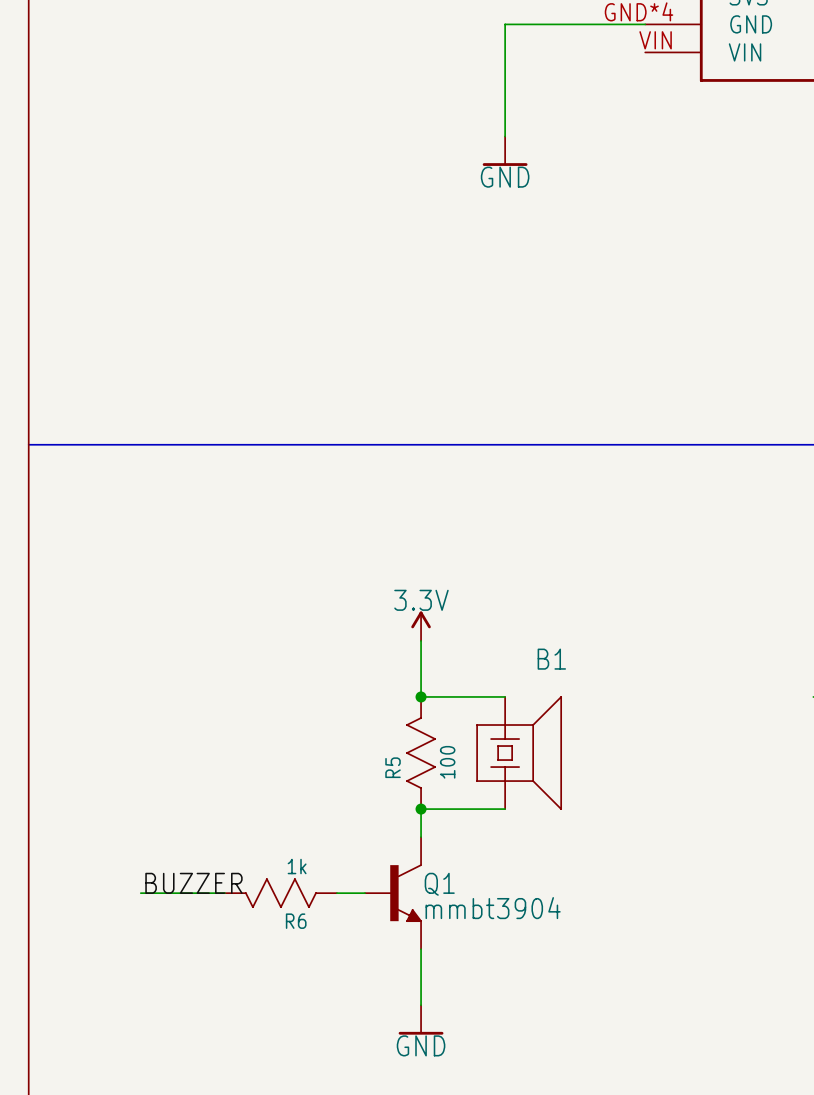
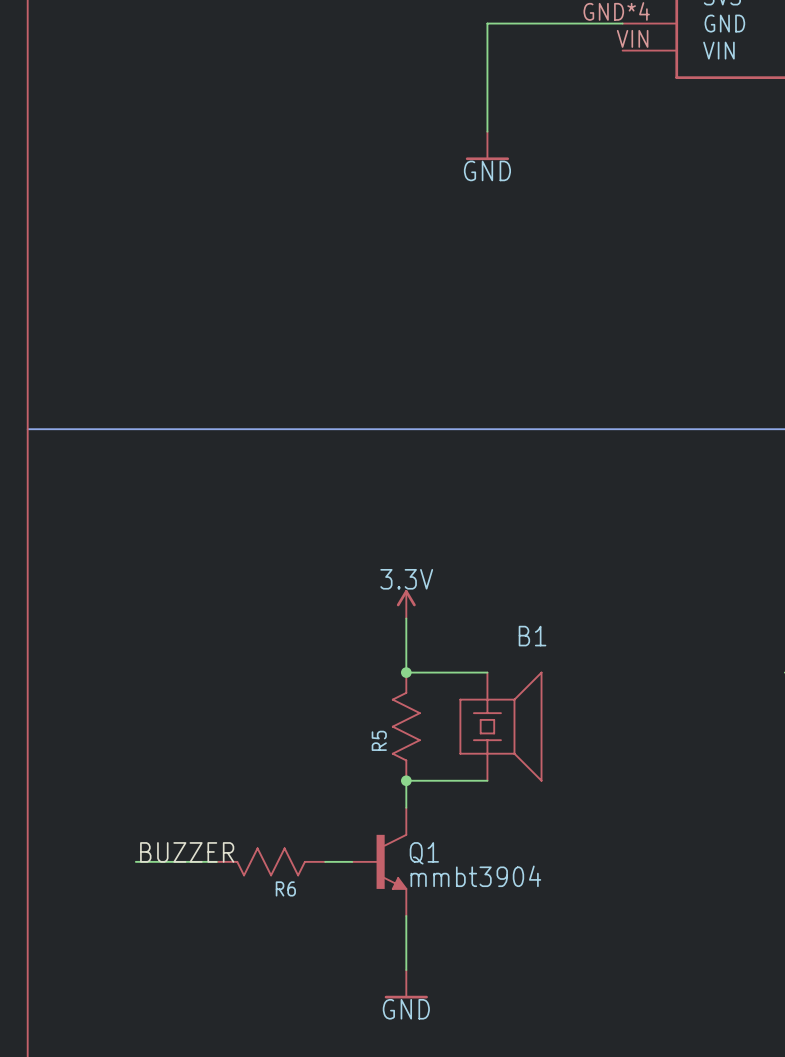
R5 value: 100 (447, 762) -> none
R6 value: 1k (297, 866) -> none

